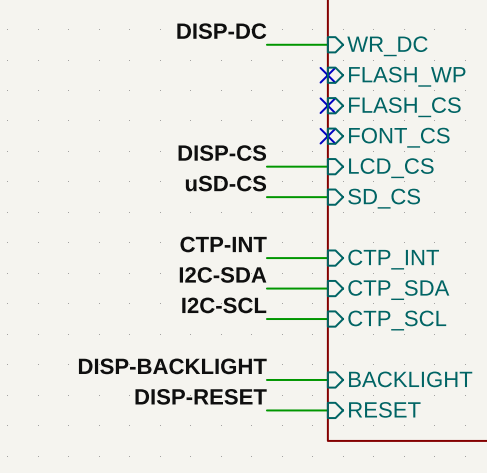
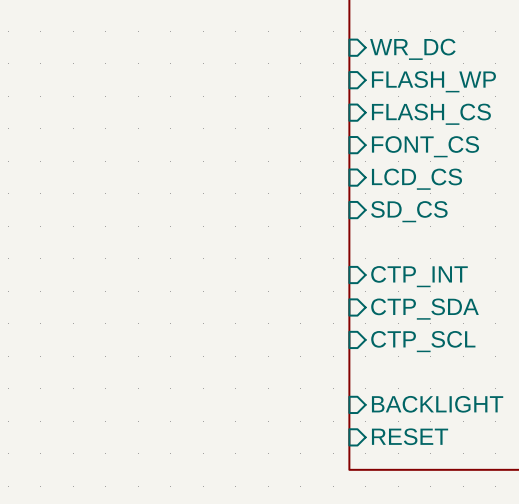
label: DISP-DC (221, 31) -> none
wire: (266, 44) (327, 44) -> none
no-connect mark: (327, 75) -> none
no-connect mark: (327, 105) -> none
no-connect mark: (327, 136) -> none
label: DISP-CS (222, 153) -> none
wire: (266, 166) (327, 166) -> none
label: uSD-CS (225, 183) -> none
wire: (266, 197) (327, 197) -> none
label: CTP-INT (223, 244) -> none
wire: (266, 258) (327, 258) -> none
label: I2C-SDA (223, 274) -> none
wire: (266, 288) (327, 288) -> none
label: I2C-SCL (224, 305) -> none
wire: (266, 319) (327, 319) -> none
label: DISP-BACKLIGHT (172, 366) -> none
wire: (266, 379) (327, 379) -> none
label: DISP-RESET (201, 396) -> none
wire: (266, 410) (327, 410) -> none

